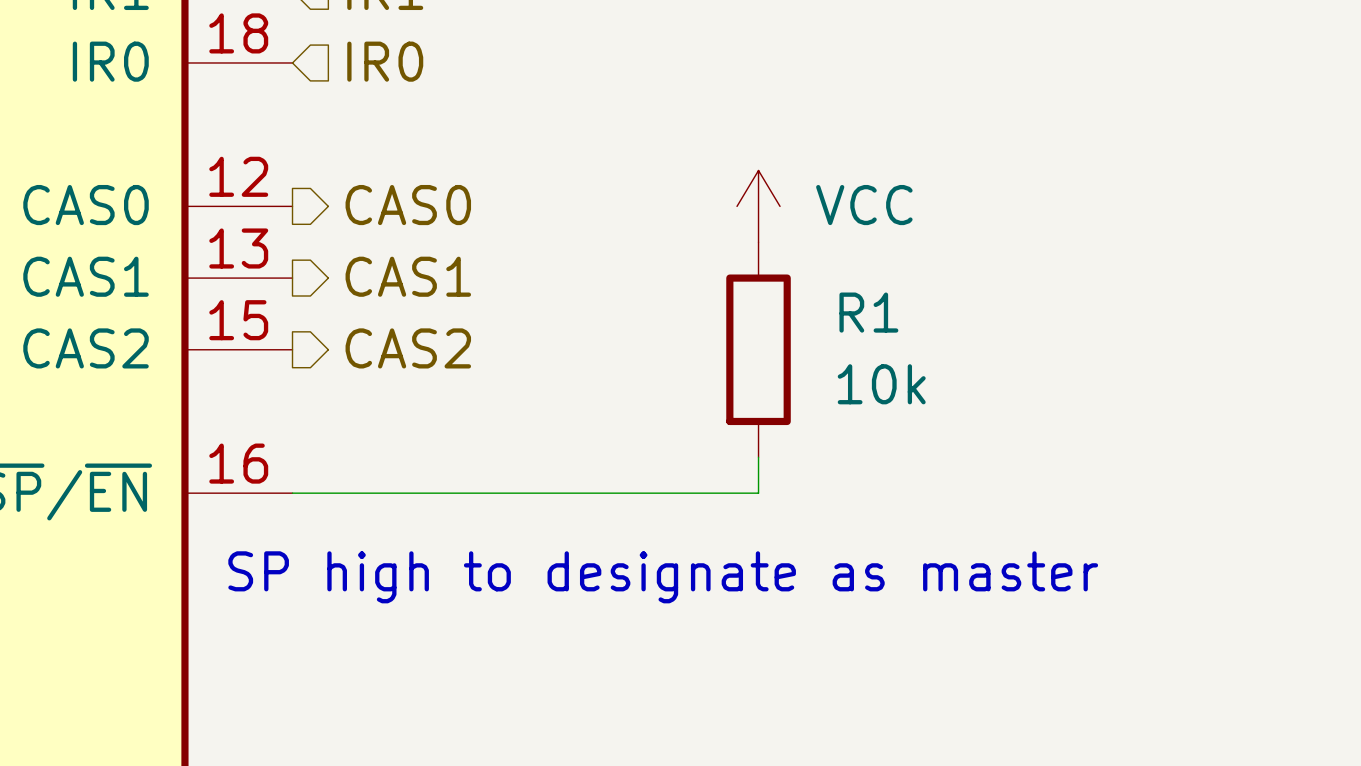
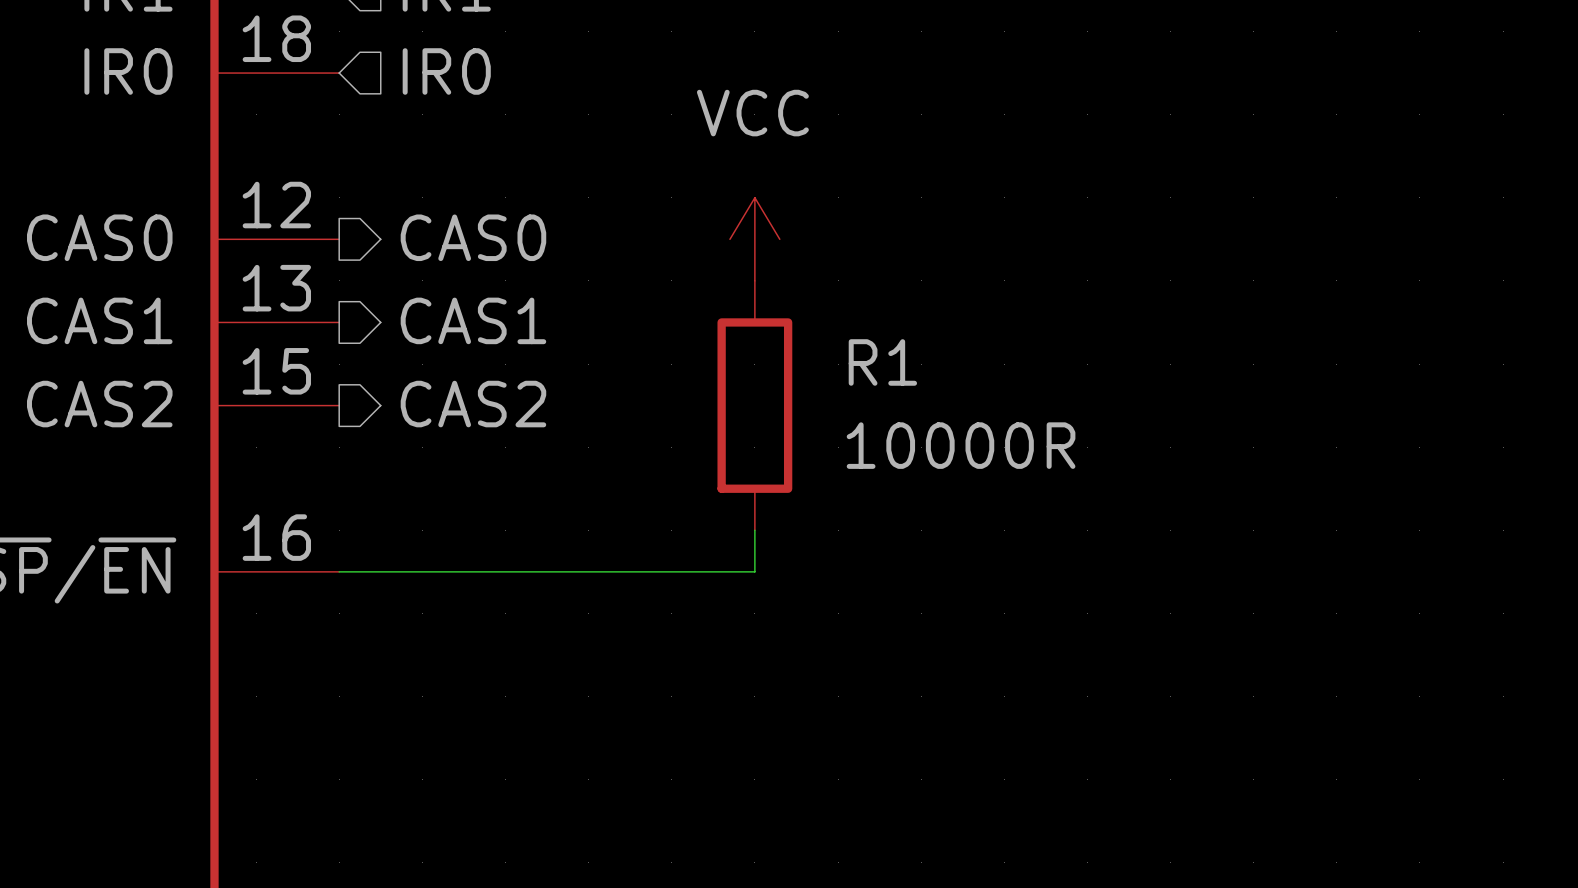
power symbol text position: VCC (864, 205) -> VCC (752, 113)
power symbol position: VCC (758, 206) -> VCC (754, 239)
R1 position: (758, 349) -> (754, 405)
R1 value: 10k (881, 384) -> 10000R (961, 445)
wire: (758, 457) (758, 493) (650, 493) -> (754, 530) (754, 571)
text: SP high to designate as master (663, 577) -> none

